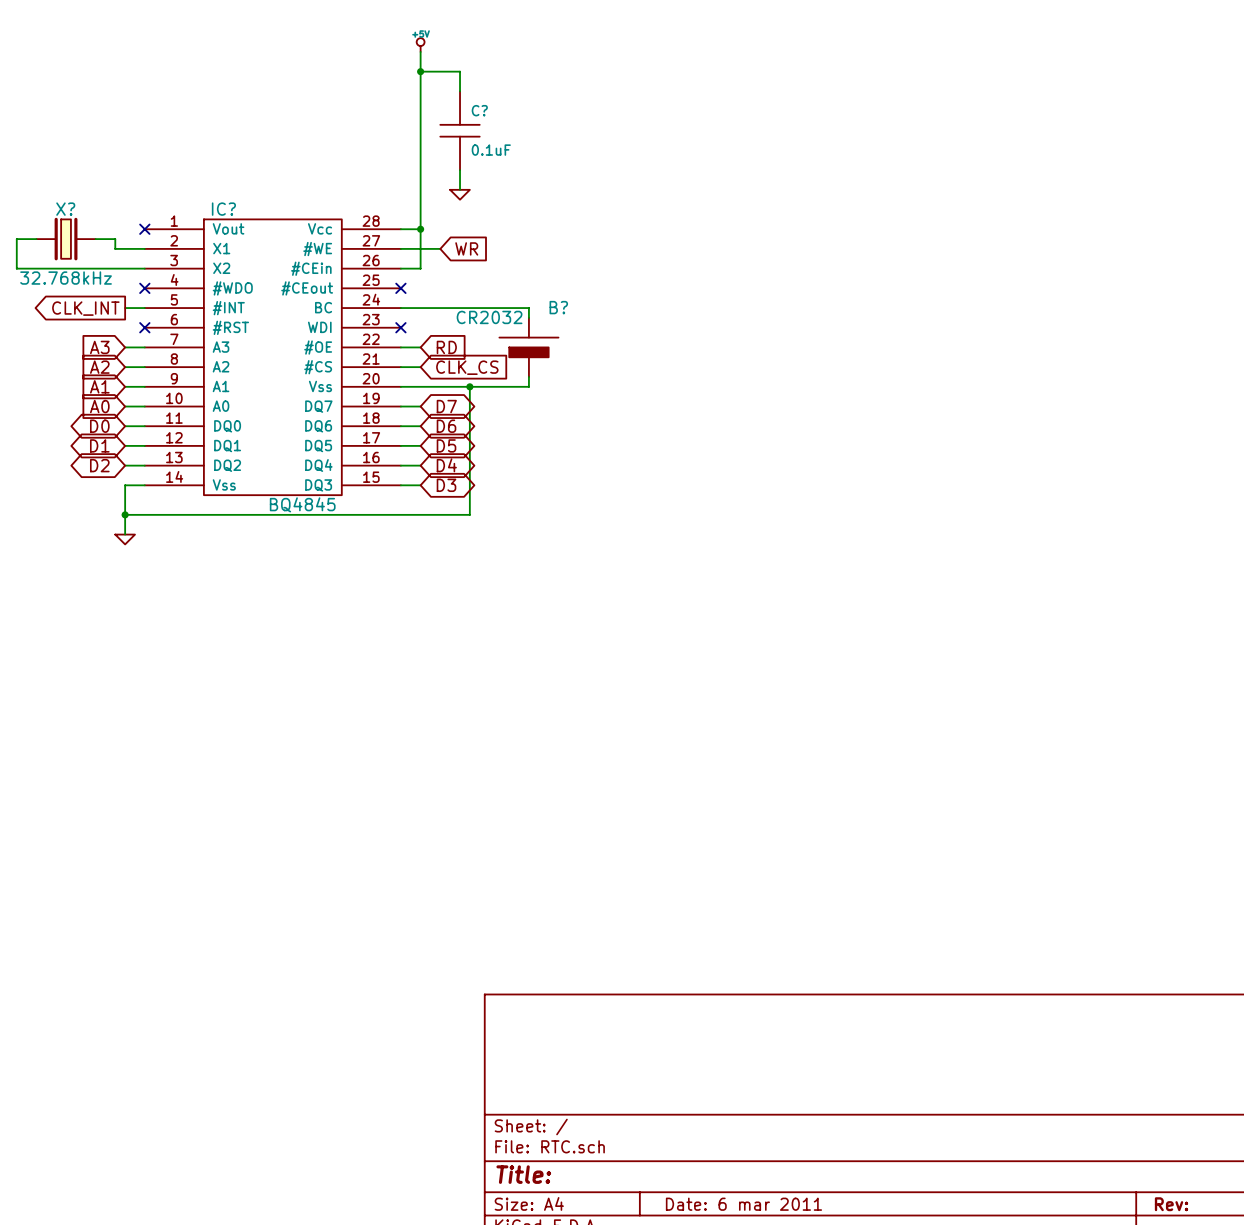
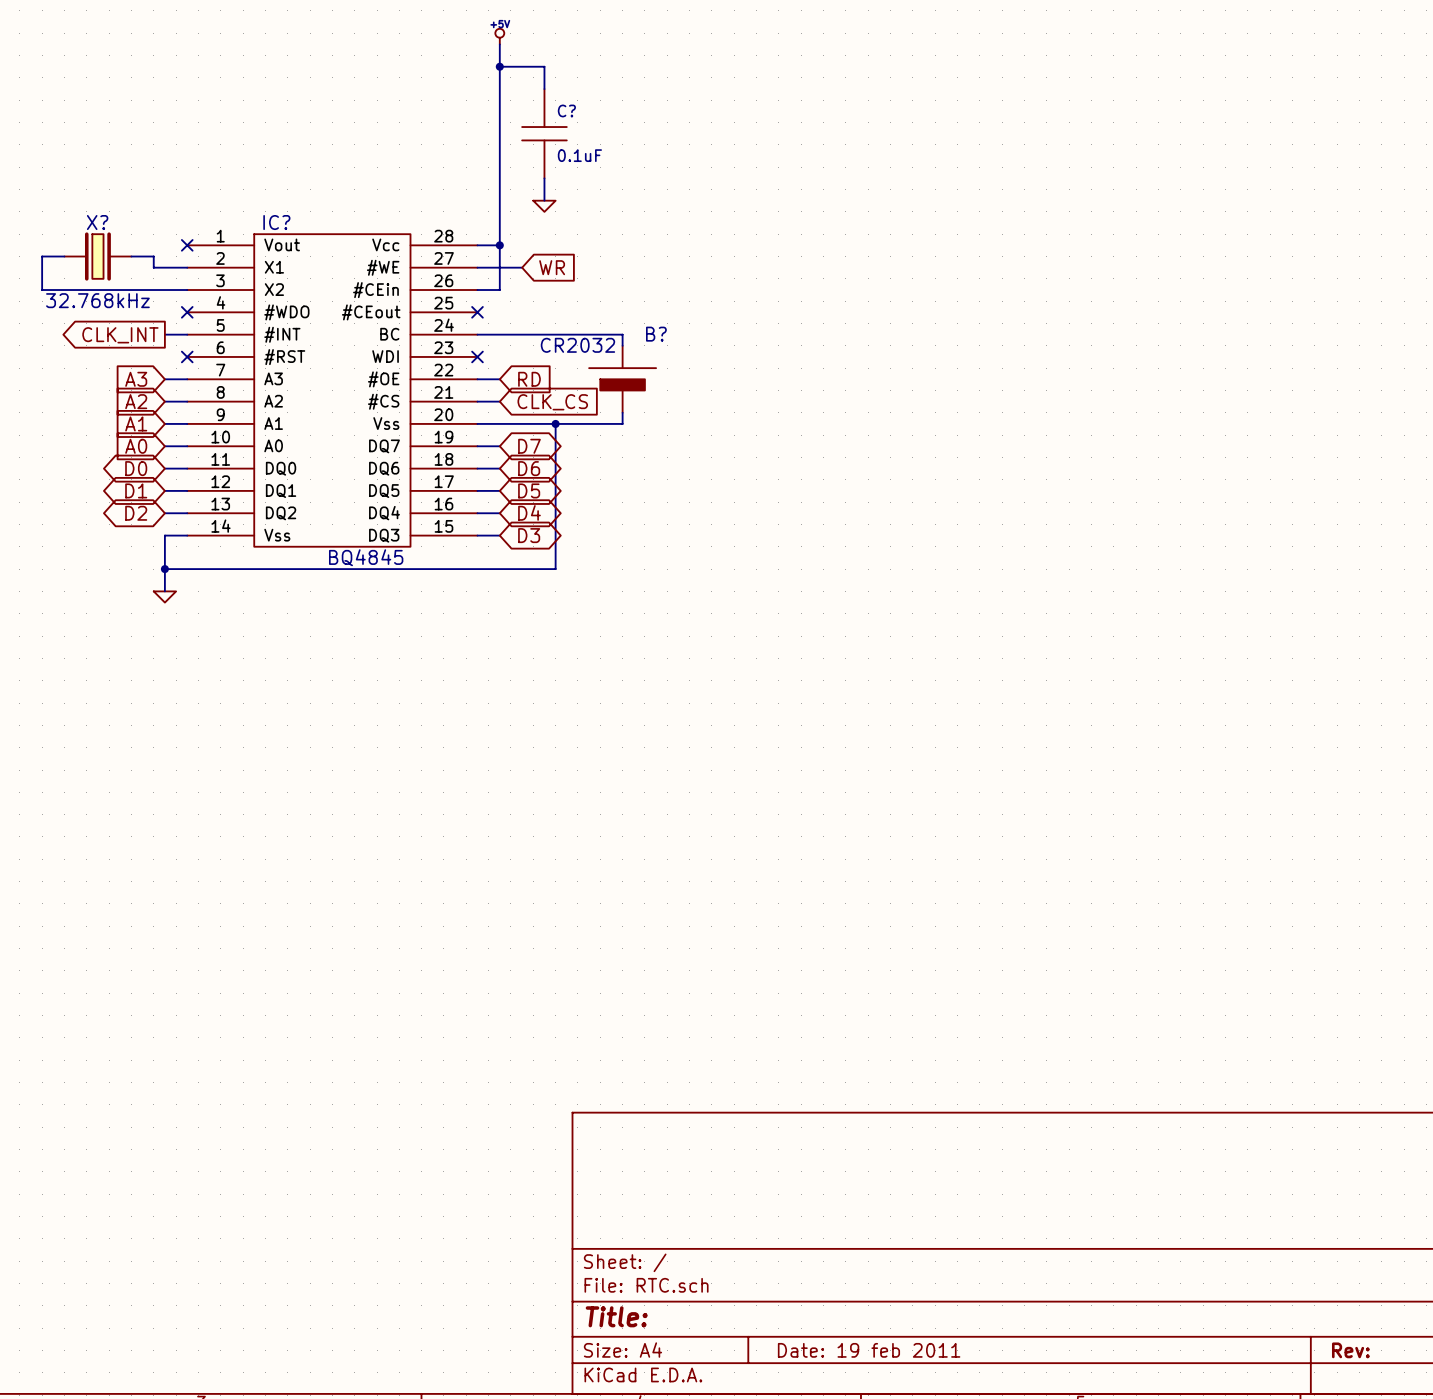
title block: Date: 6 mar 2011 (743, 1204) -> Date: 19 feb 2011 (869, 1350)

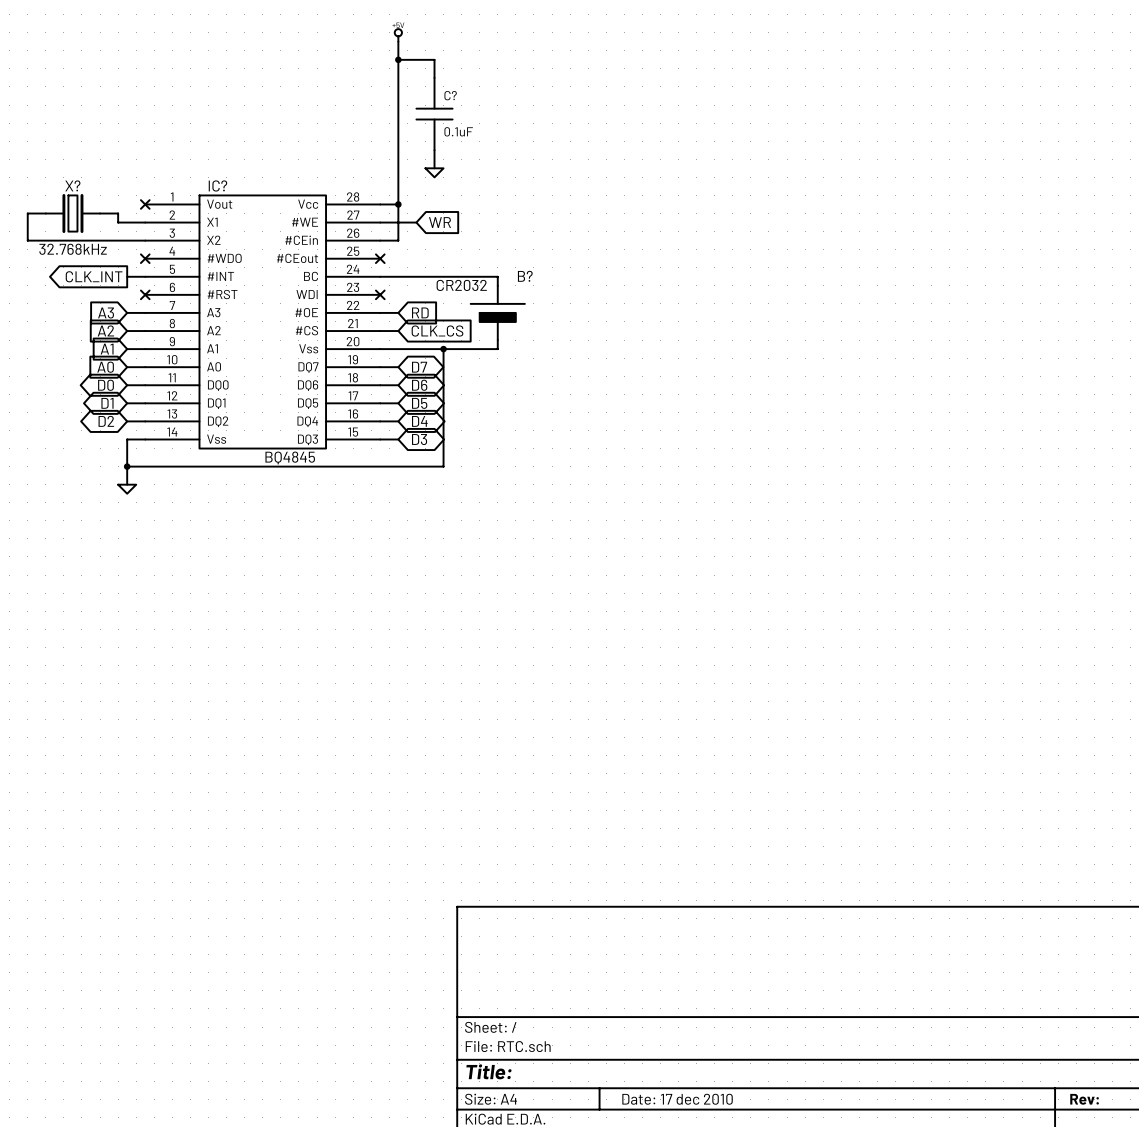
title block: Date: 19 feb 2011 (869, 1350) -> Date: 17 dec 2010 (677, 1099)

